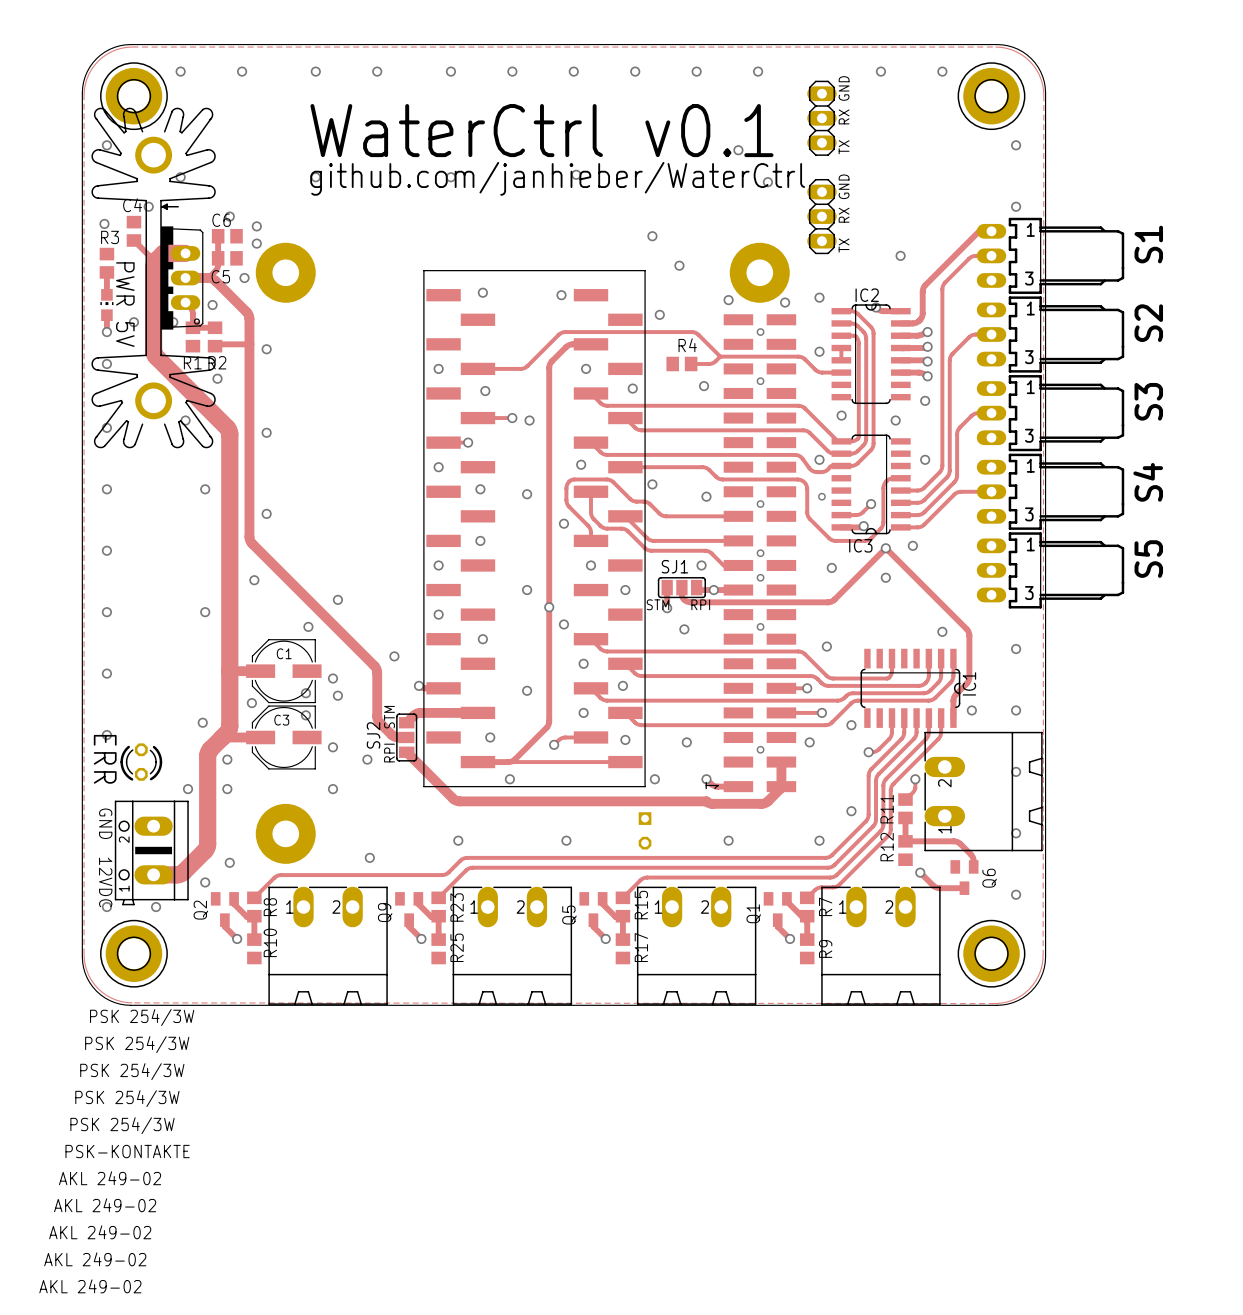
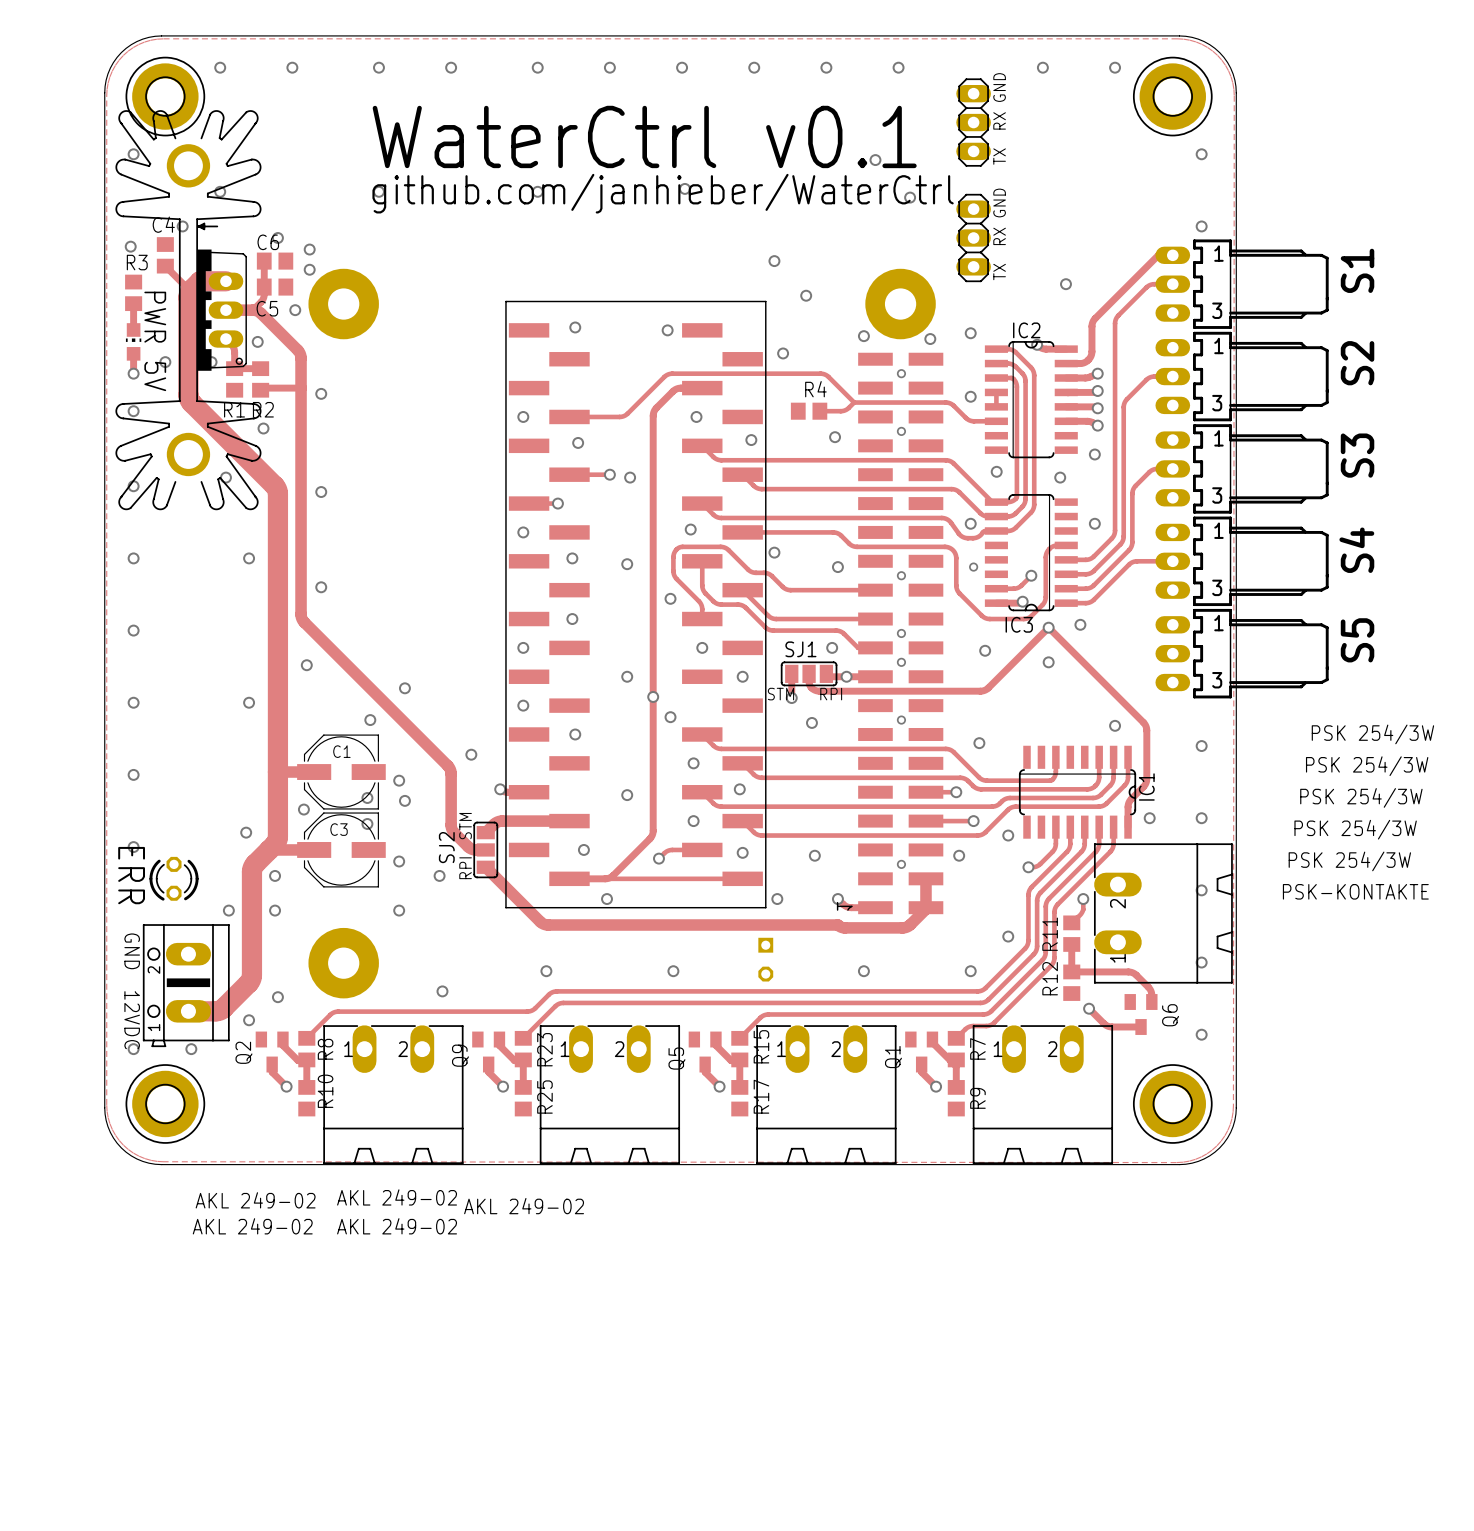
drawing: none -> [1282, 724, 1435, 900]
drawing: [39, 1009, 195, 1294] -> none
drawing: none -> [192, 1189, 585, 1235]

